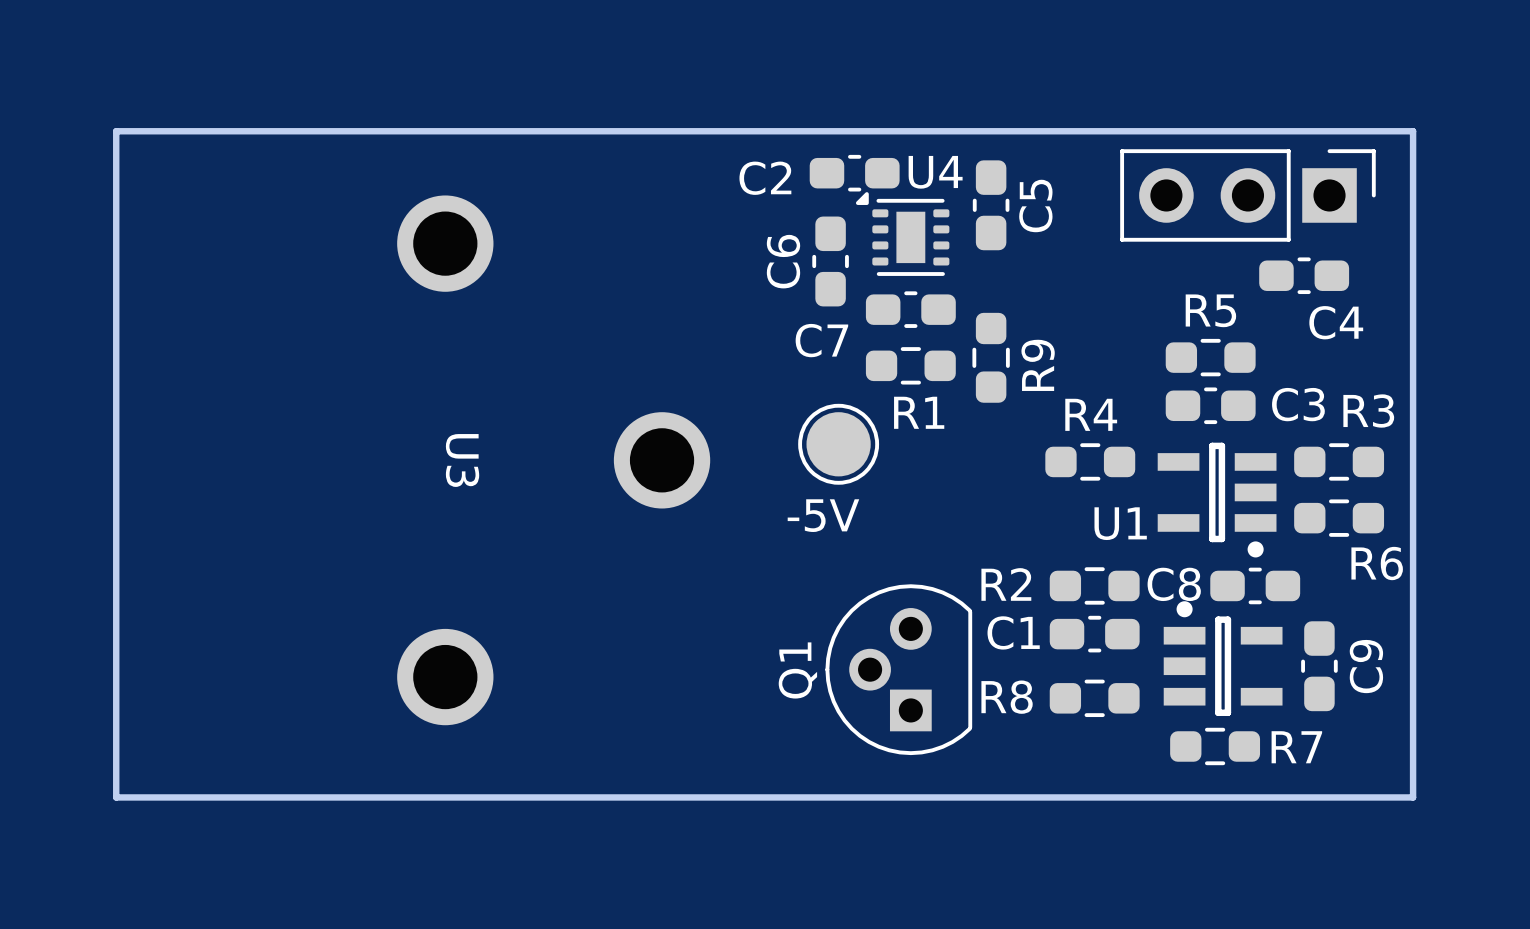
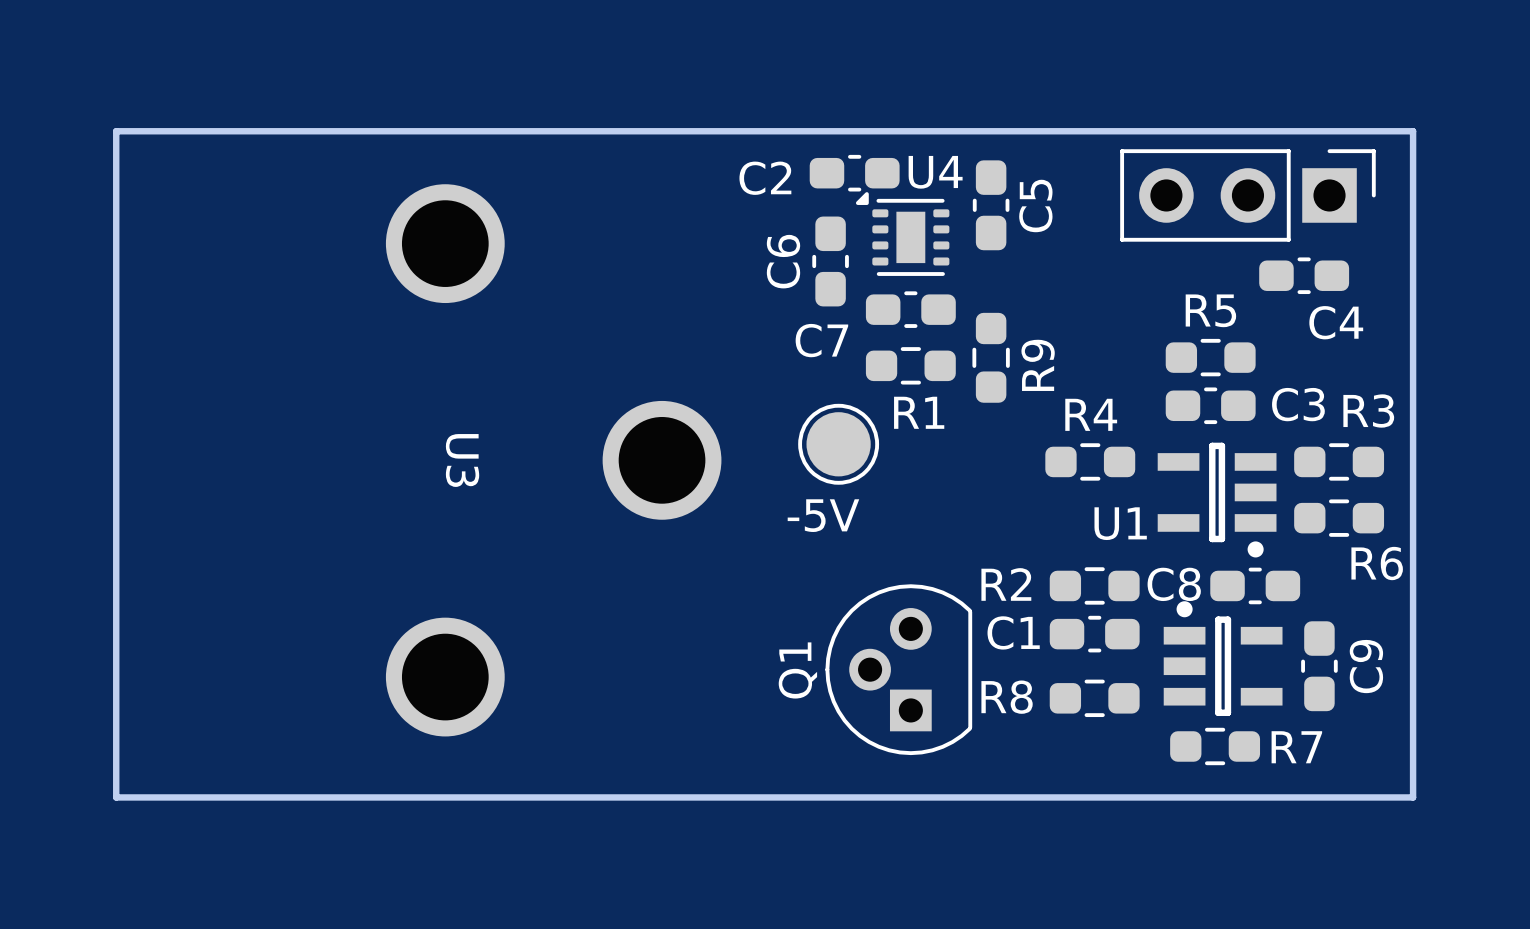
U3 footprint: [397, 195, 711, 726] -> [385, 184, 722, 737]

